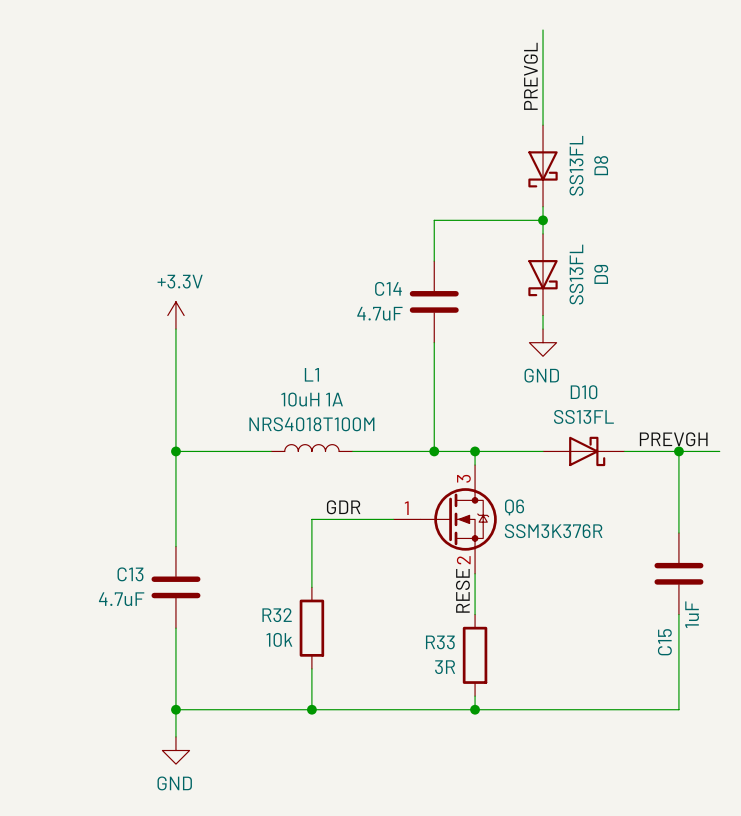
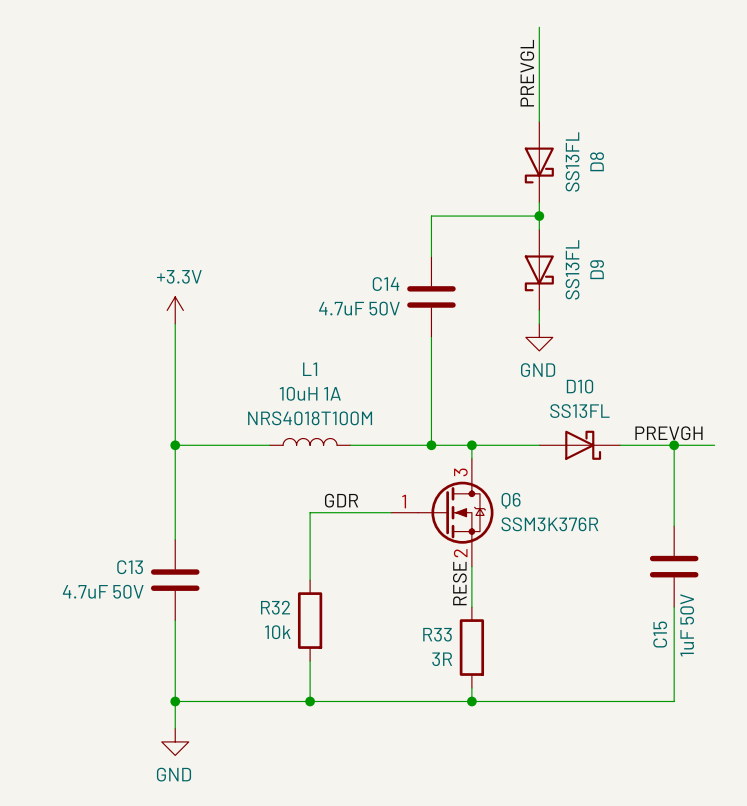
C14 value: 4.7uF (379, 313) -> 4.7uF 50V (359, 308)
C13 value: 4.7uF (121, 599) -> 4.7uF 50V (103, 591)
C15 value: 1uF (692, 614) -> 1uF 50V (687, 625)

